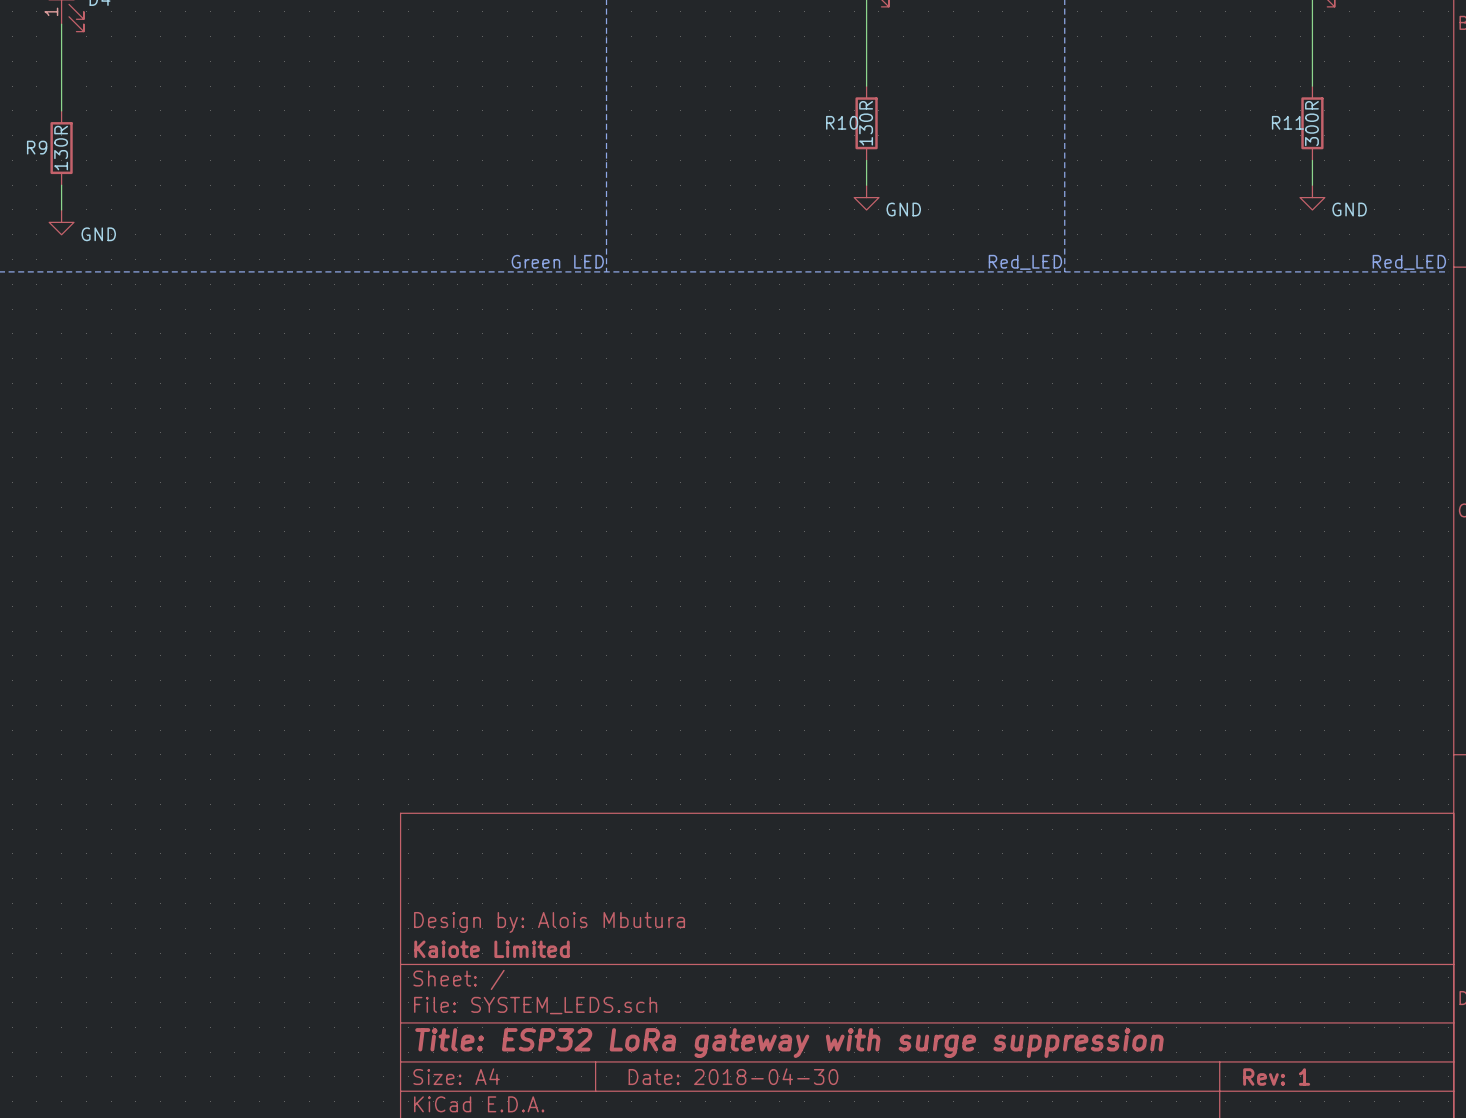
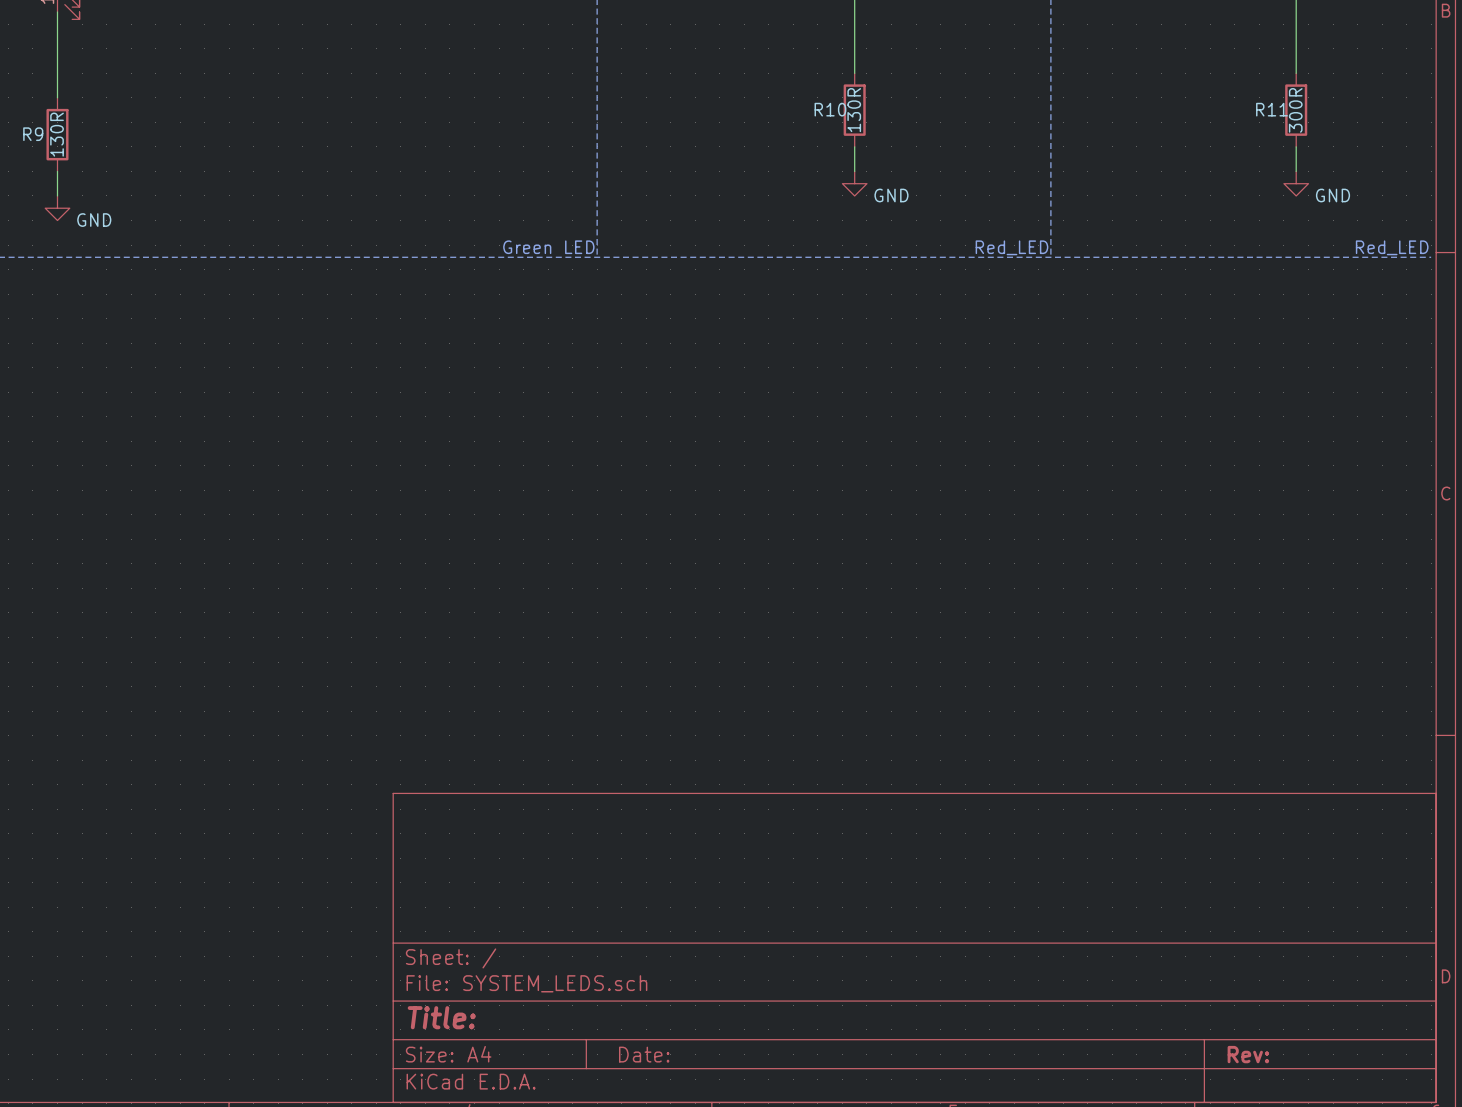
title block: Design by: Alois Mbutura (549, 922) -> none
title block: Kaiote Limited (492, 949) -> none
title block: Title: ESP32 LoRa gateway with surge suppression (789, 1043) -> Title: (441, 1017)
title block: Date: 2018-04-30 (733, 1076) -> Date: (644, 1054)
title block: Rev: 1 (1276, 1077) -> Rev: (1248, 1054)

